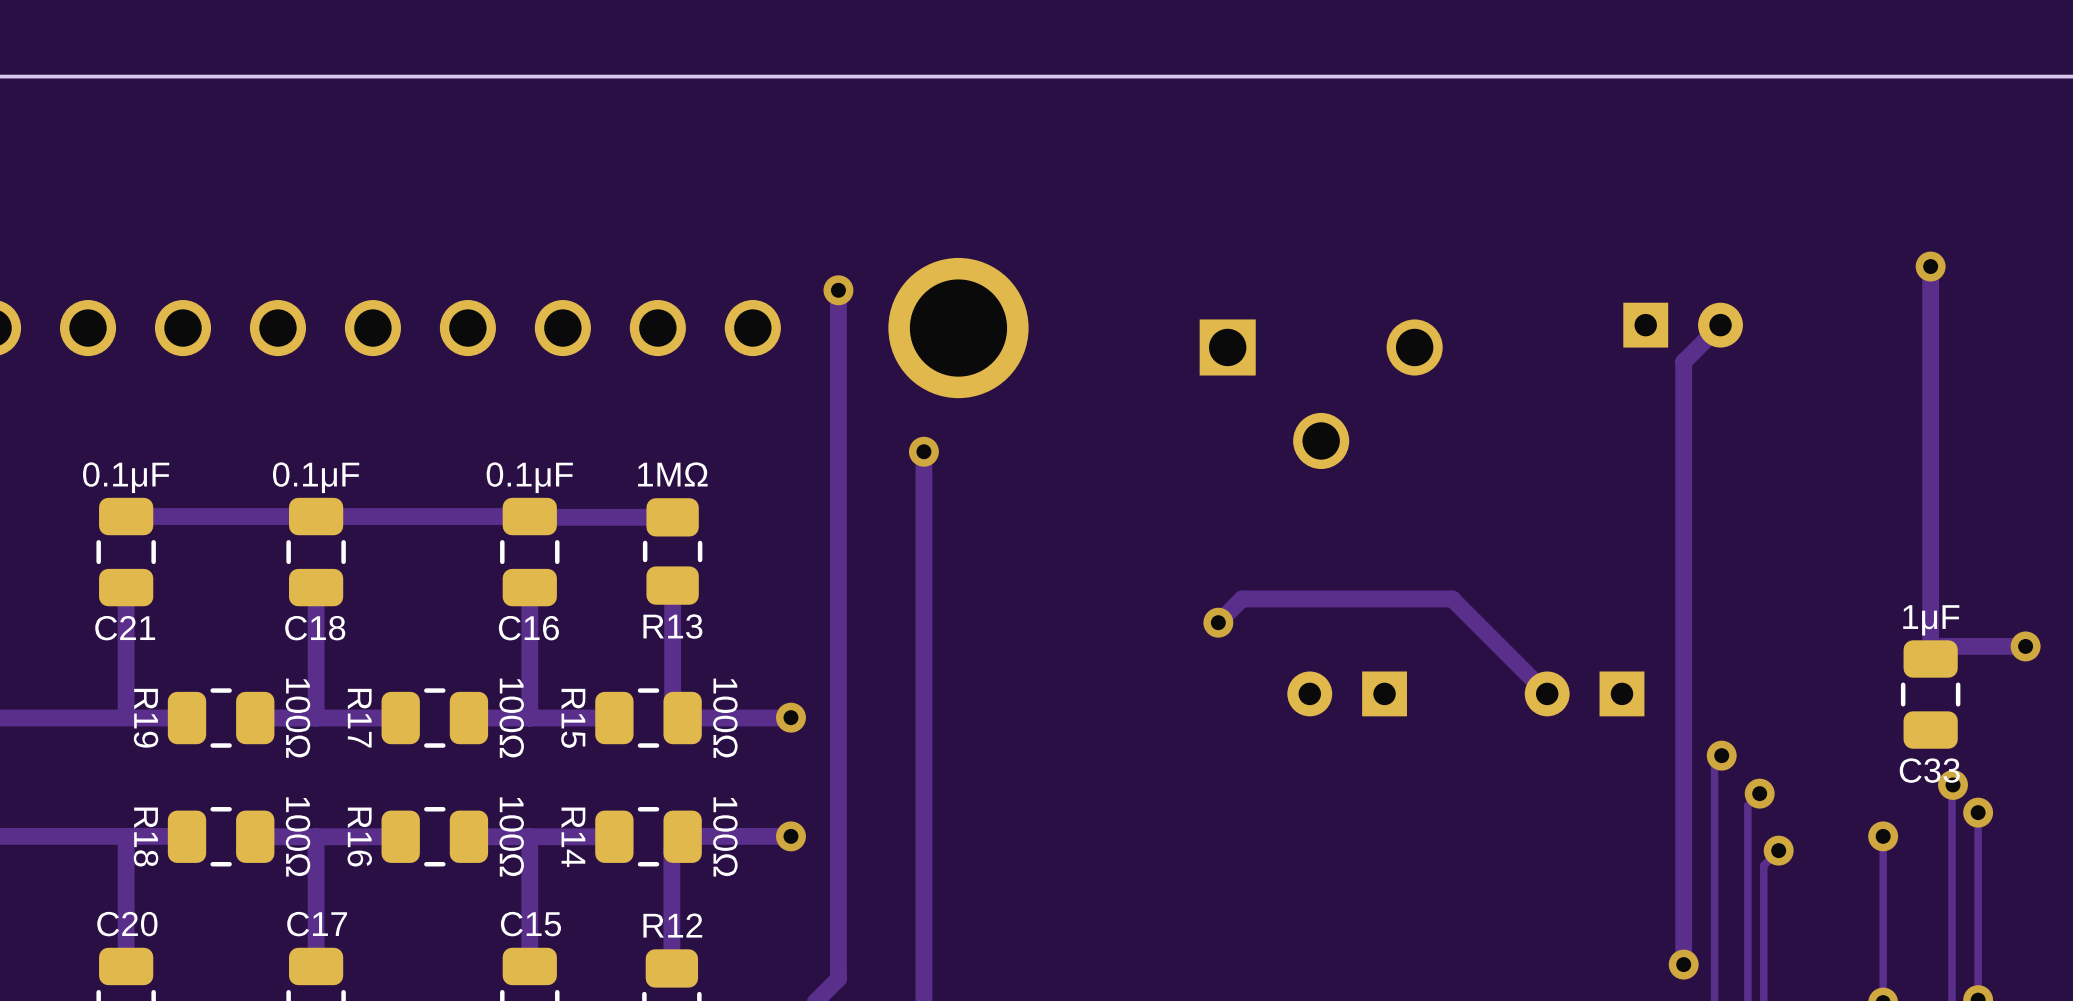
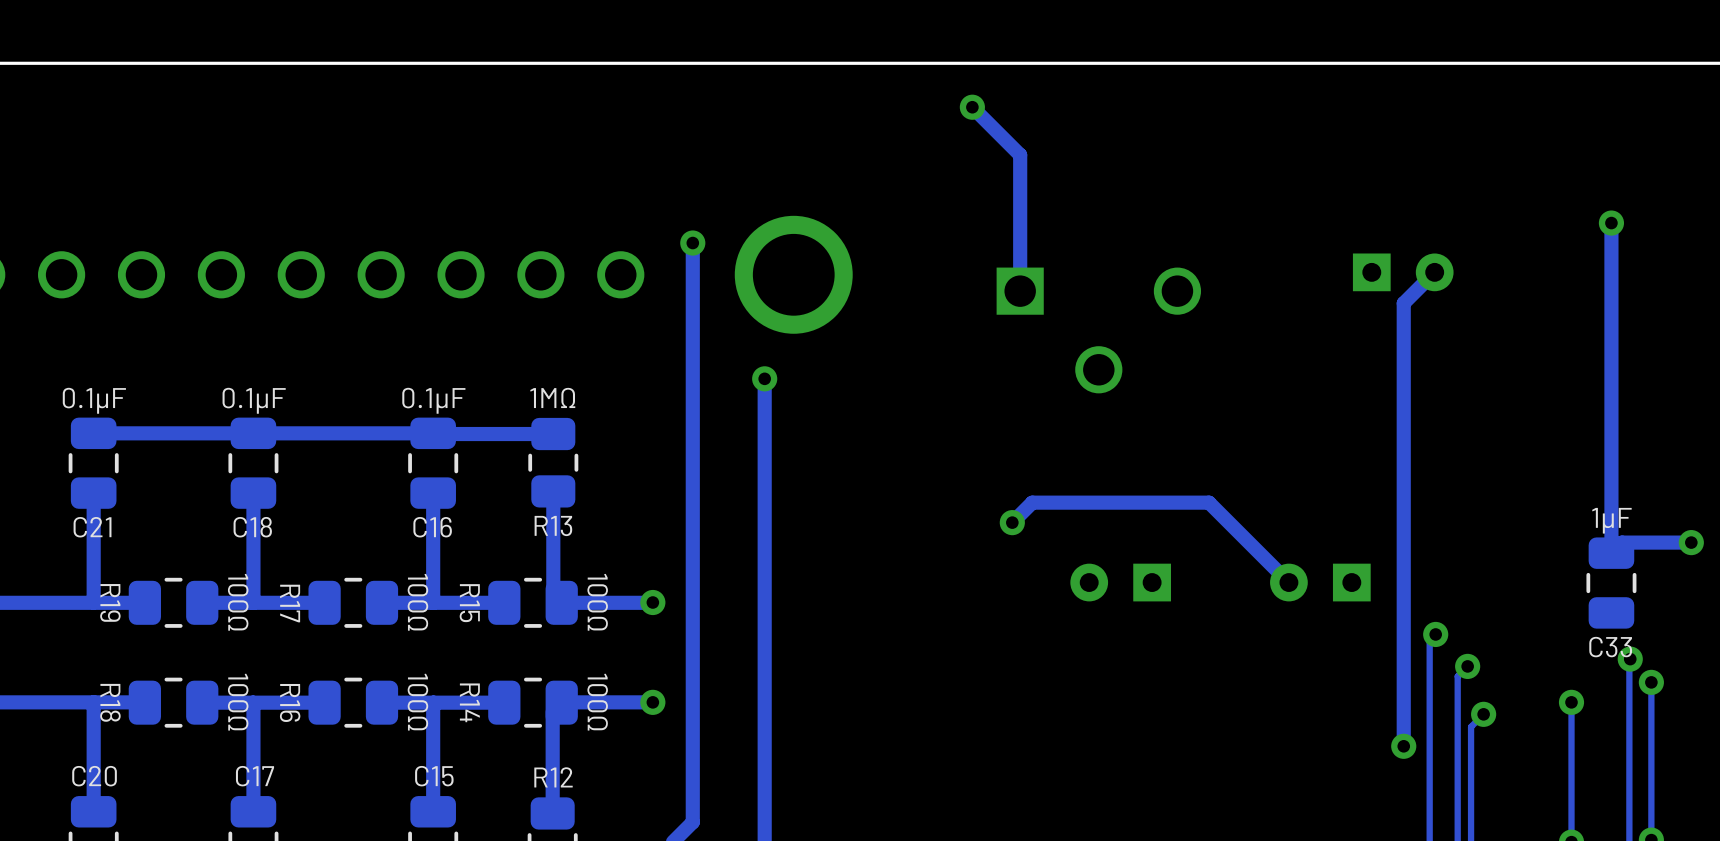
track: none -> (972, 107) (1020, 155) (1020, 291)
via: none -> (972, 107)
track: (1683, 888) (1683, 964) -> none
via position: (1683, 964) -> (1403, 746)

